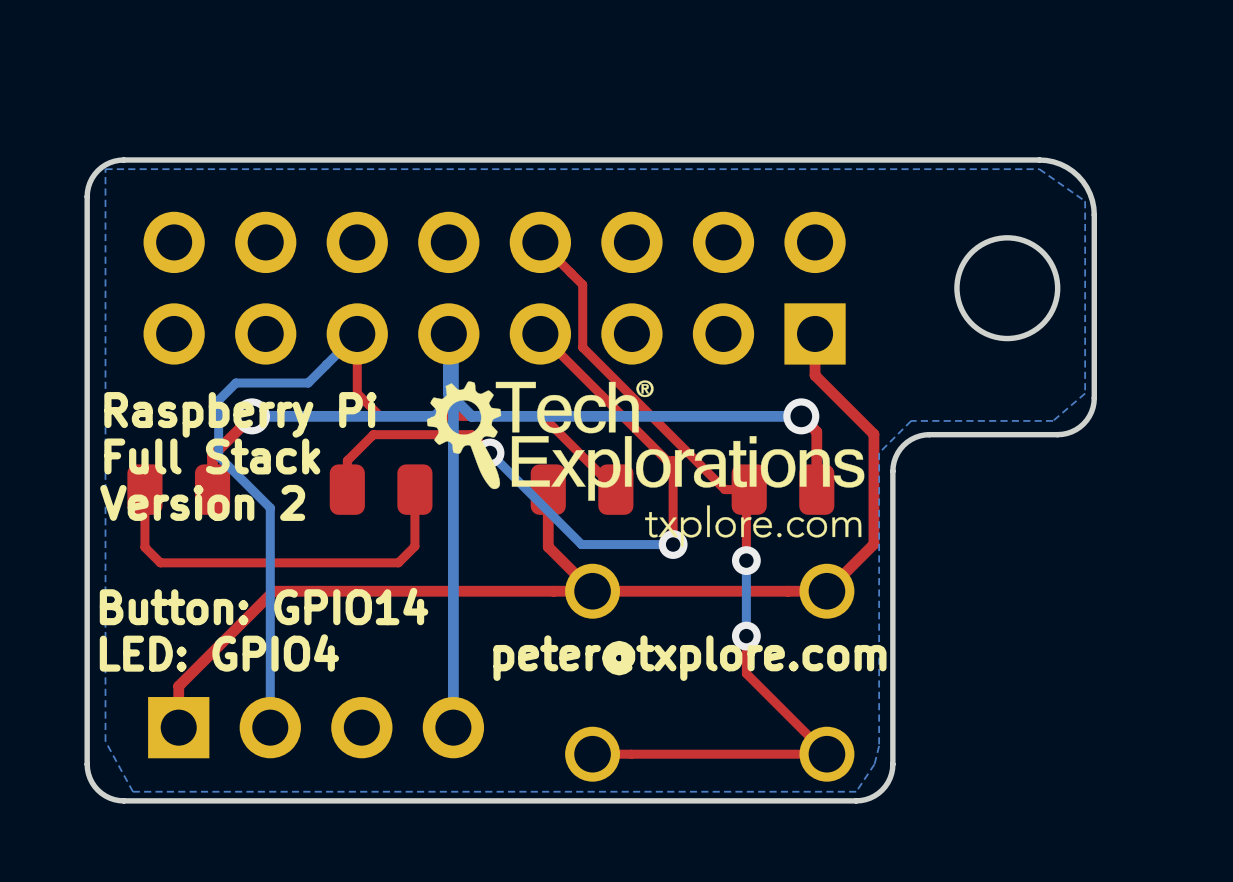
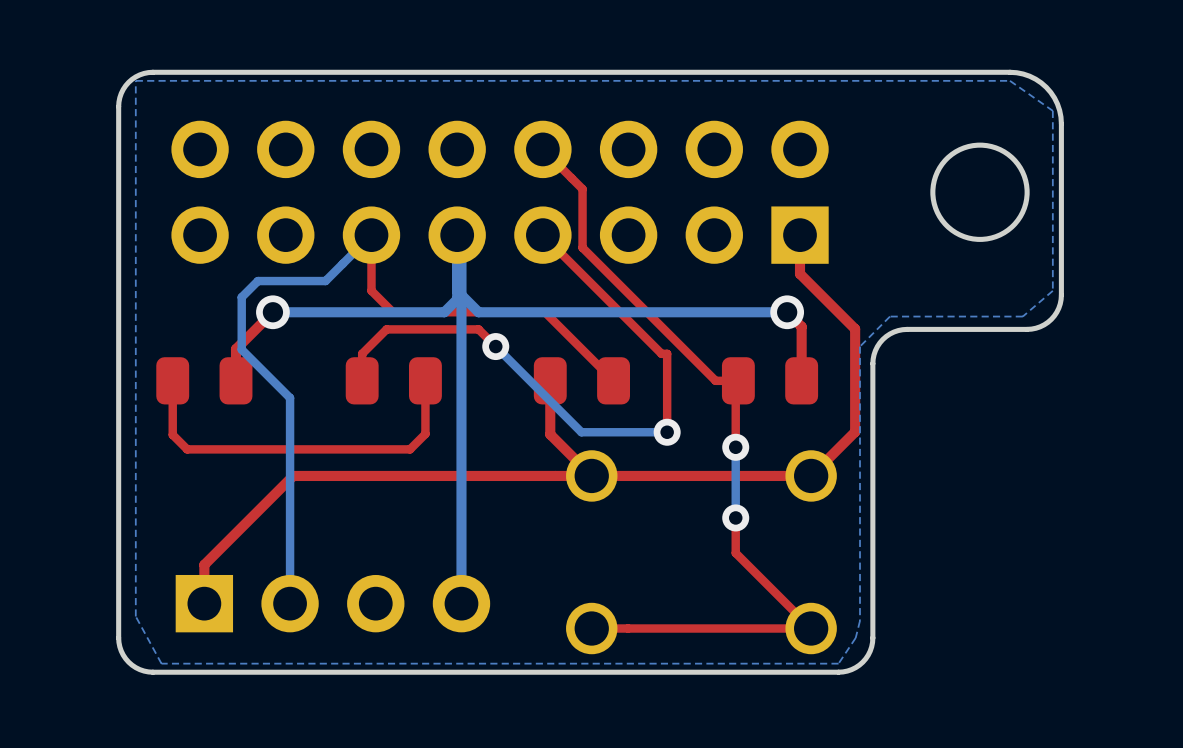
drawing: [426, 380, 865, 547] -> none
text: Raspberry Pi (240, 414) -> none
text: Full Stack (212, 456) -> none
text: Version 2 (202, 502) -> none
text: Button: GPIO14 (264, 606) -> none
text: LED: GPIO4 (219, 652) -> none
text: peter@txplore.com (689, 658) -> none

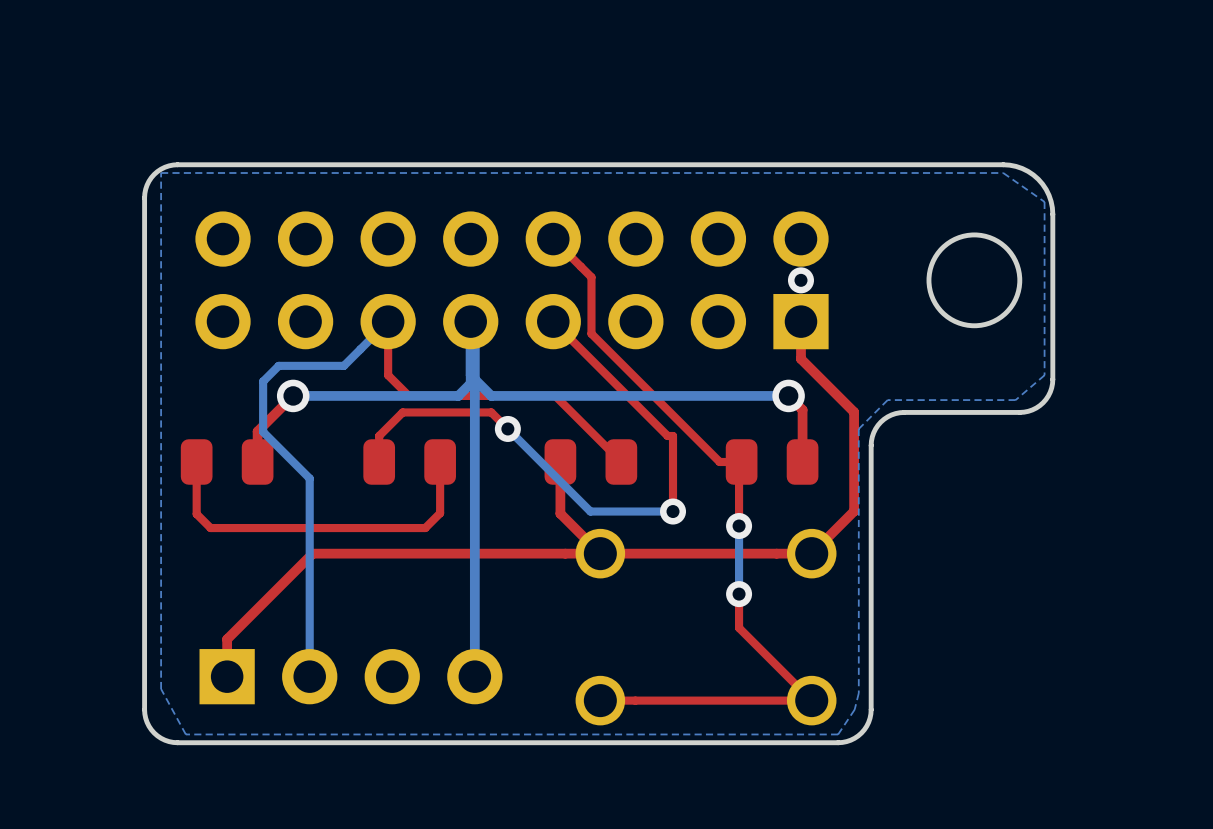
via: none -> (800, 280)

